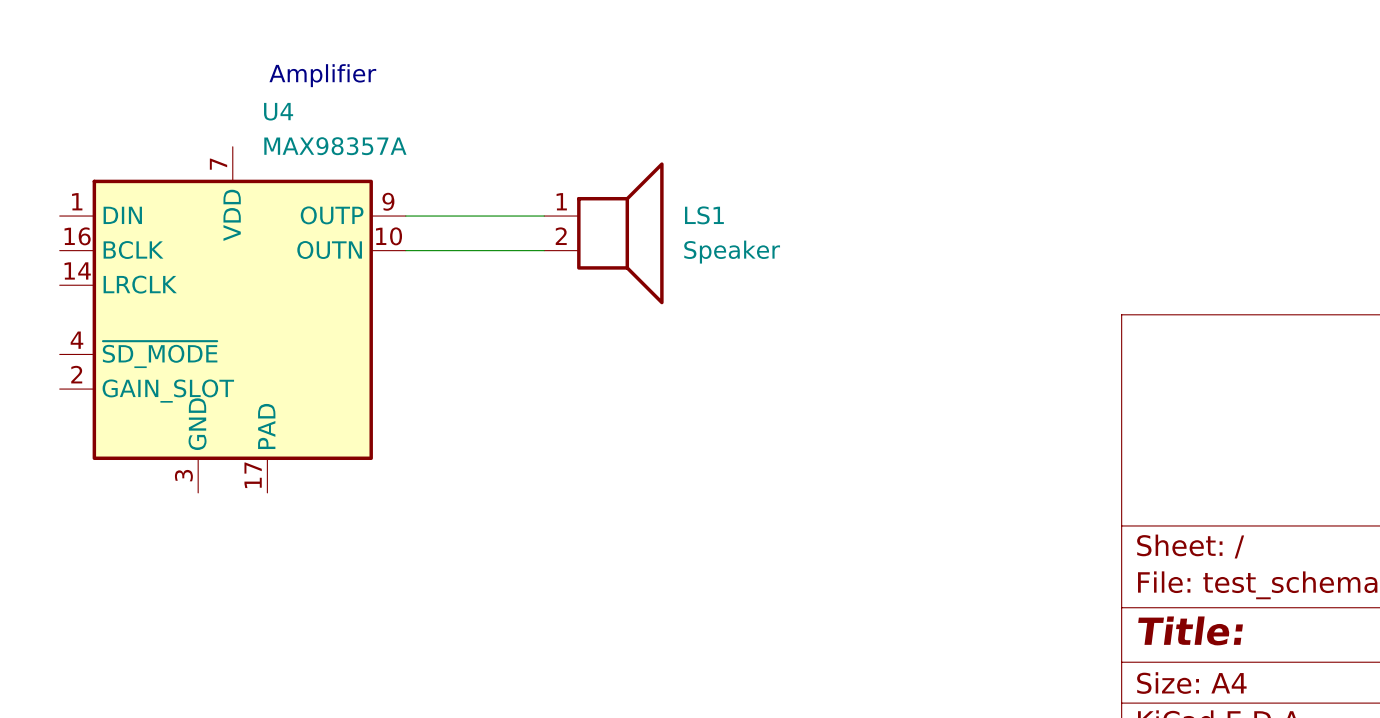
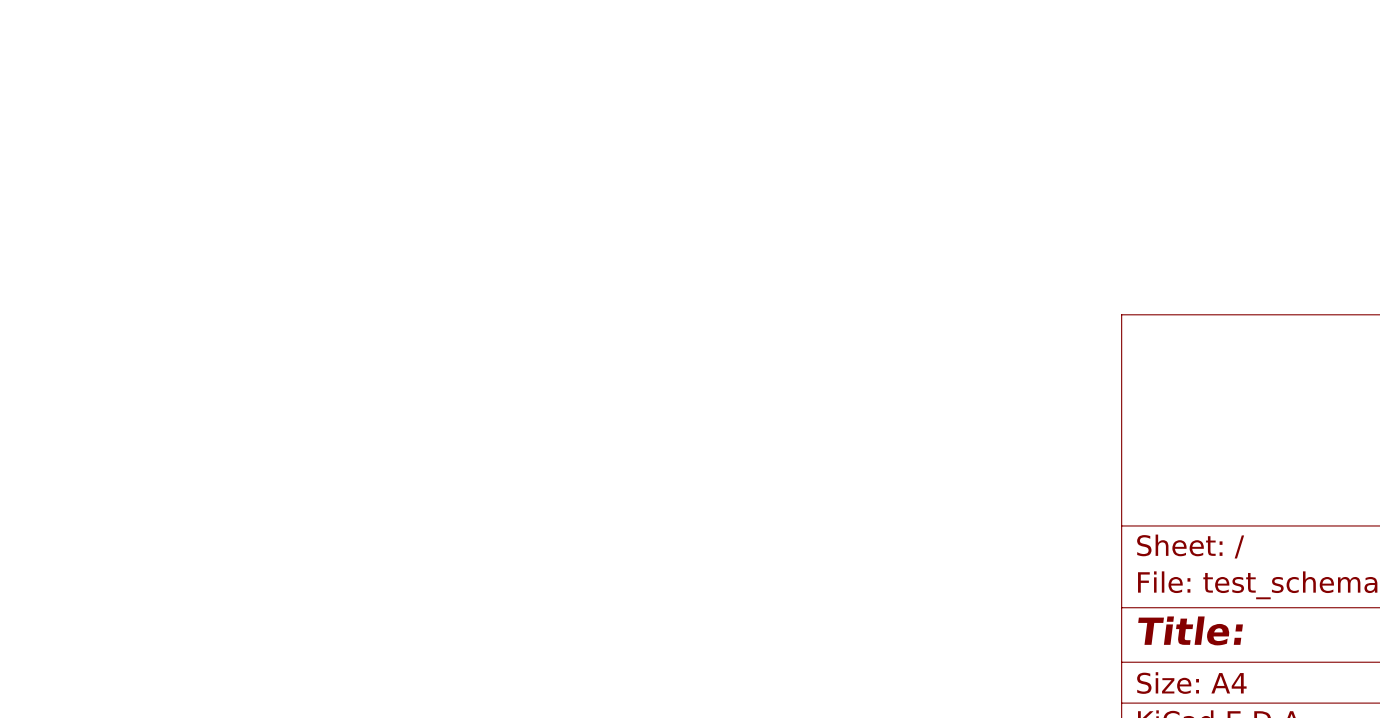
text: Amplifier (322, 75) -> none
wire: (405, 216) (544, 216) -> none
LS1: Speaker (603, 233) -> none
wire: (405, 250) (544, 250) -> none
U4: MAX98357A (232, 319) -> none

